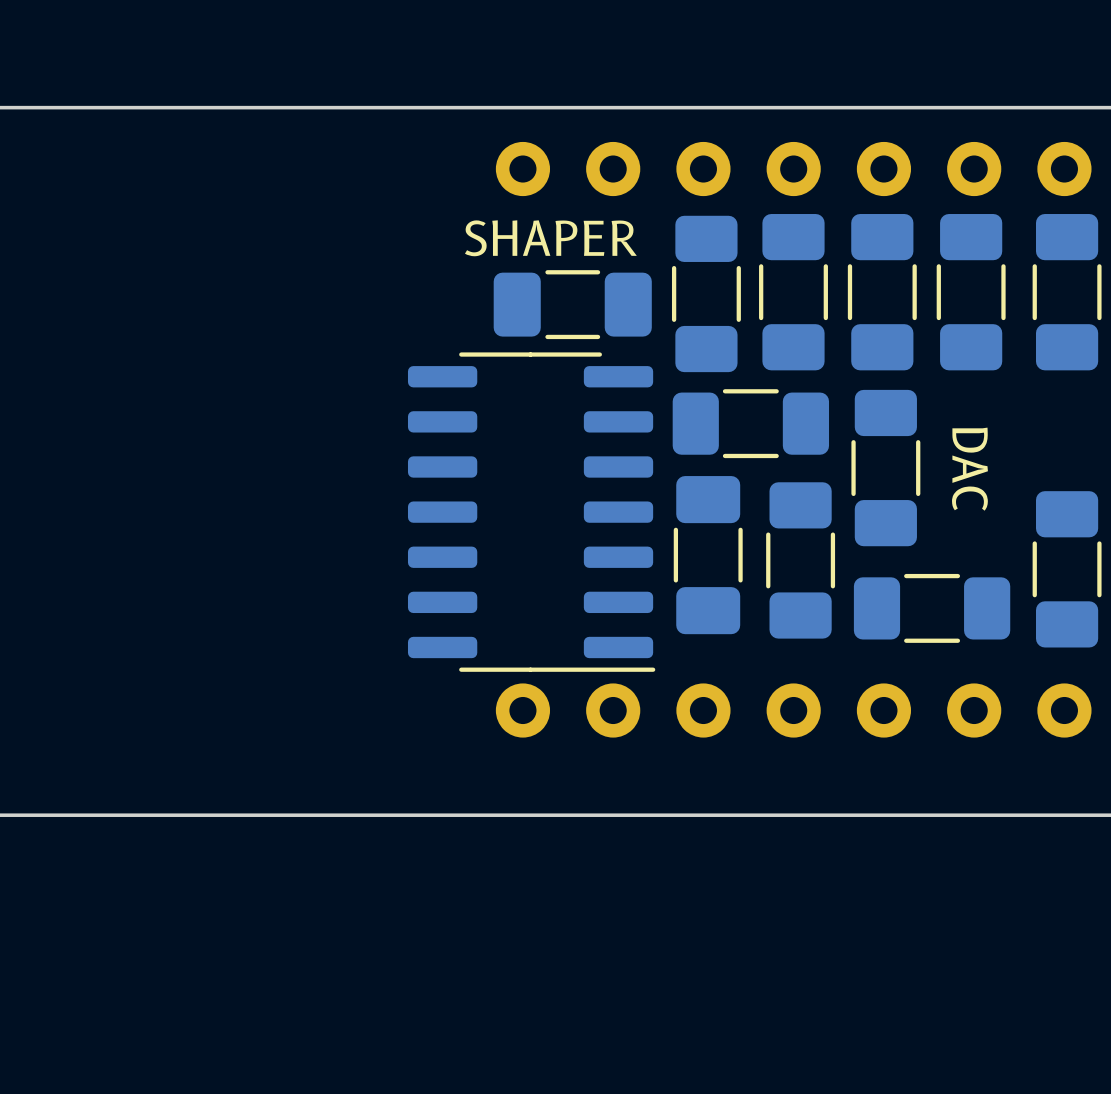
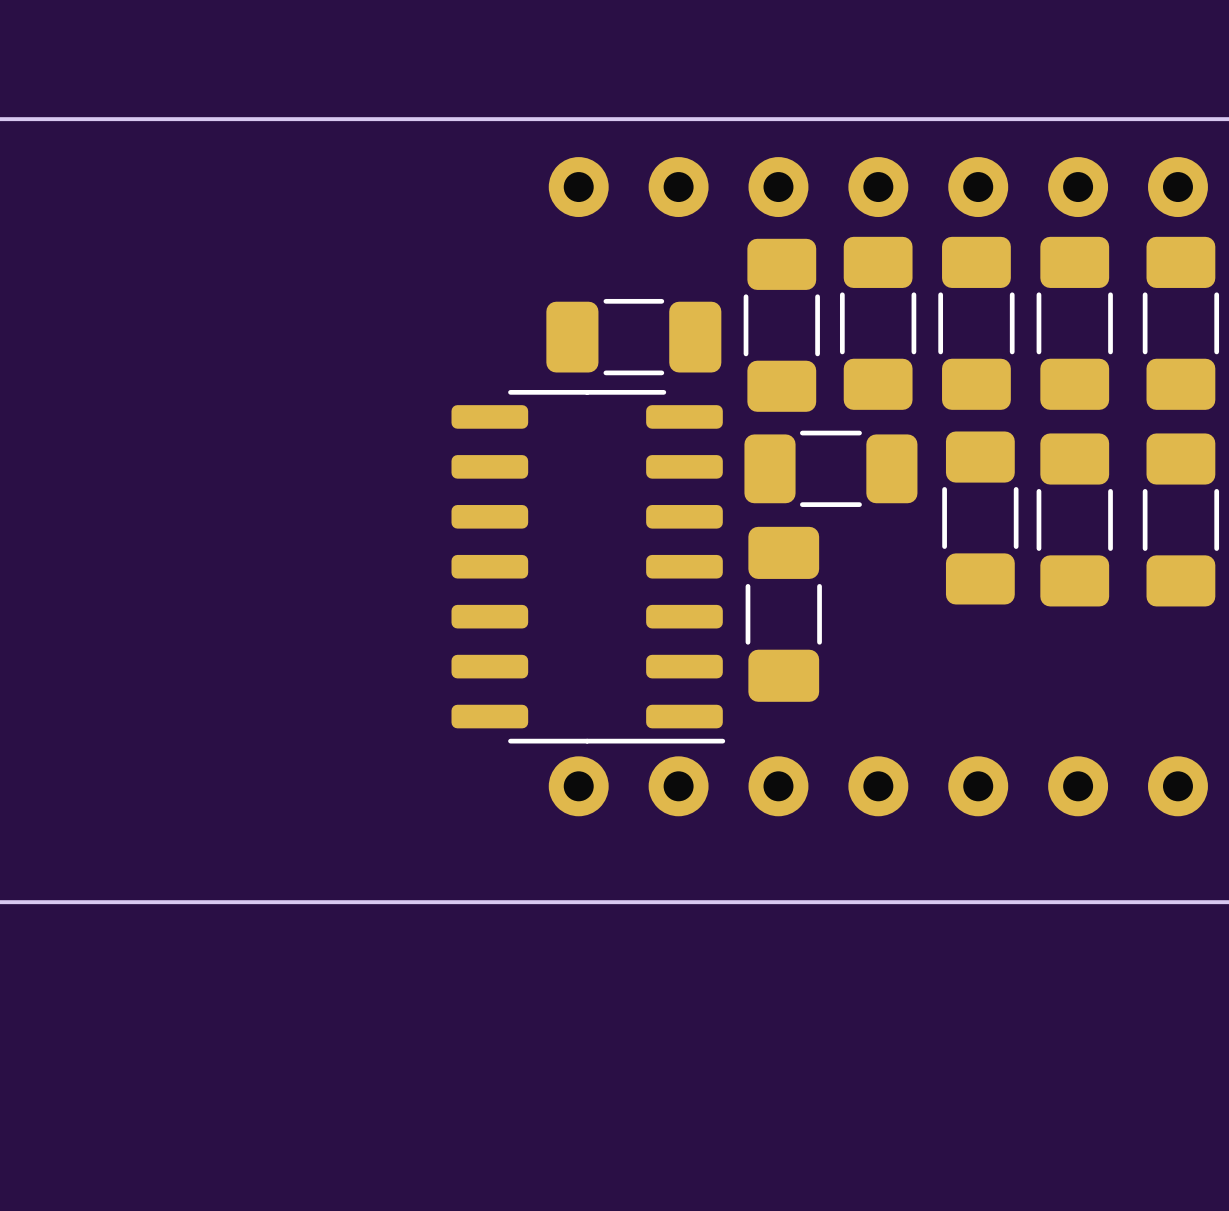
text: SHAPER (550, 238) -> none
text: DAC (969, 469) -> none
part: none -> (1074, 519)
part: none -> (1180, 519)
part: (800, 560) -> none
part: (1067, 569) -> none
part: (932, 608) -> none

